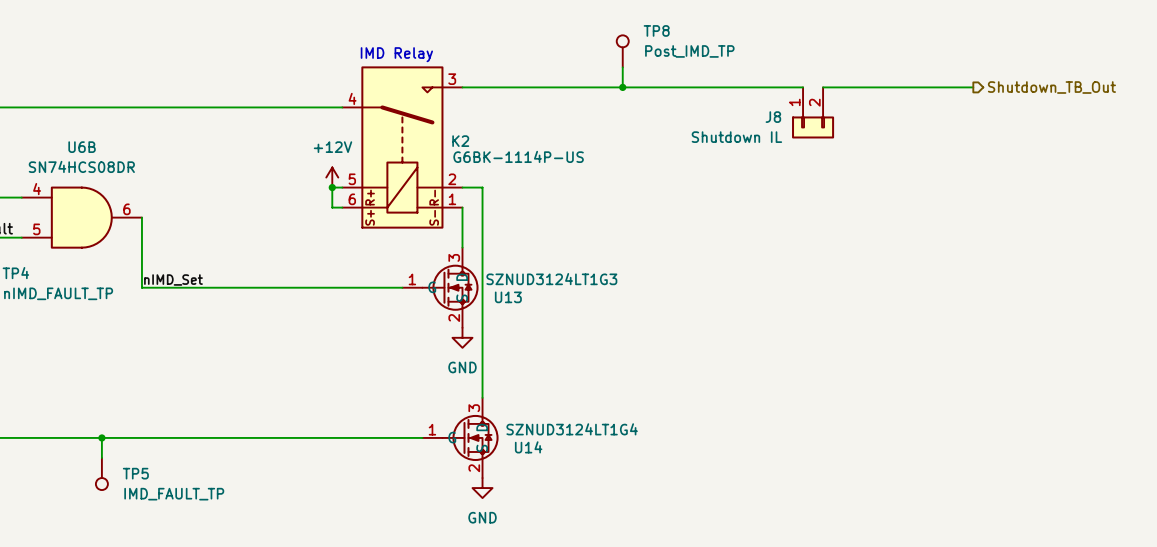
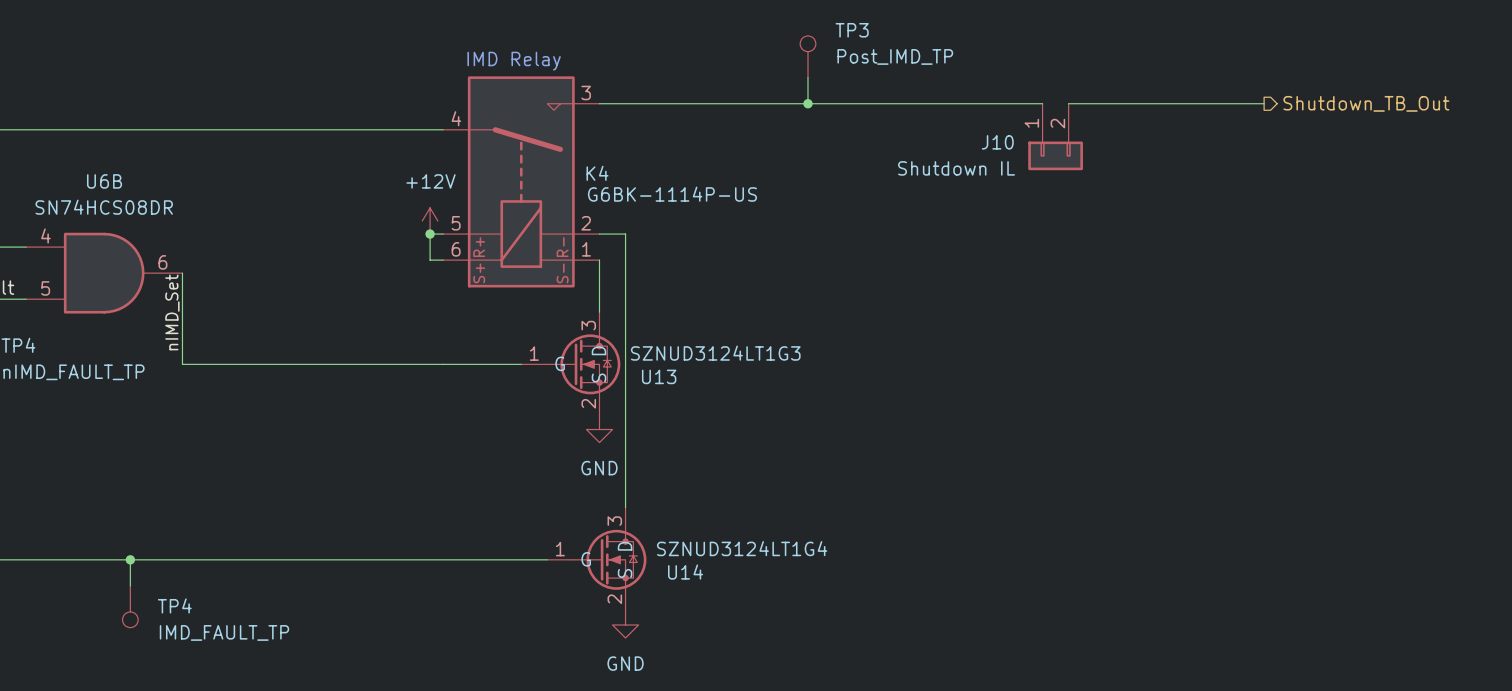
TP8 name: TP8 (656, 30) -> TP3 (852, 30)
J8 name: J8 (773, 117) -> J10 (997, 142)
K2 name: K2 (460, 141) -> K4 (597, 173)
label rotation: 0° (173, 279) -> 90° counterclockwise (172, 312)
TP5 name: TP5 (135, 473) -> TP4 (174, 605)

